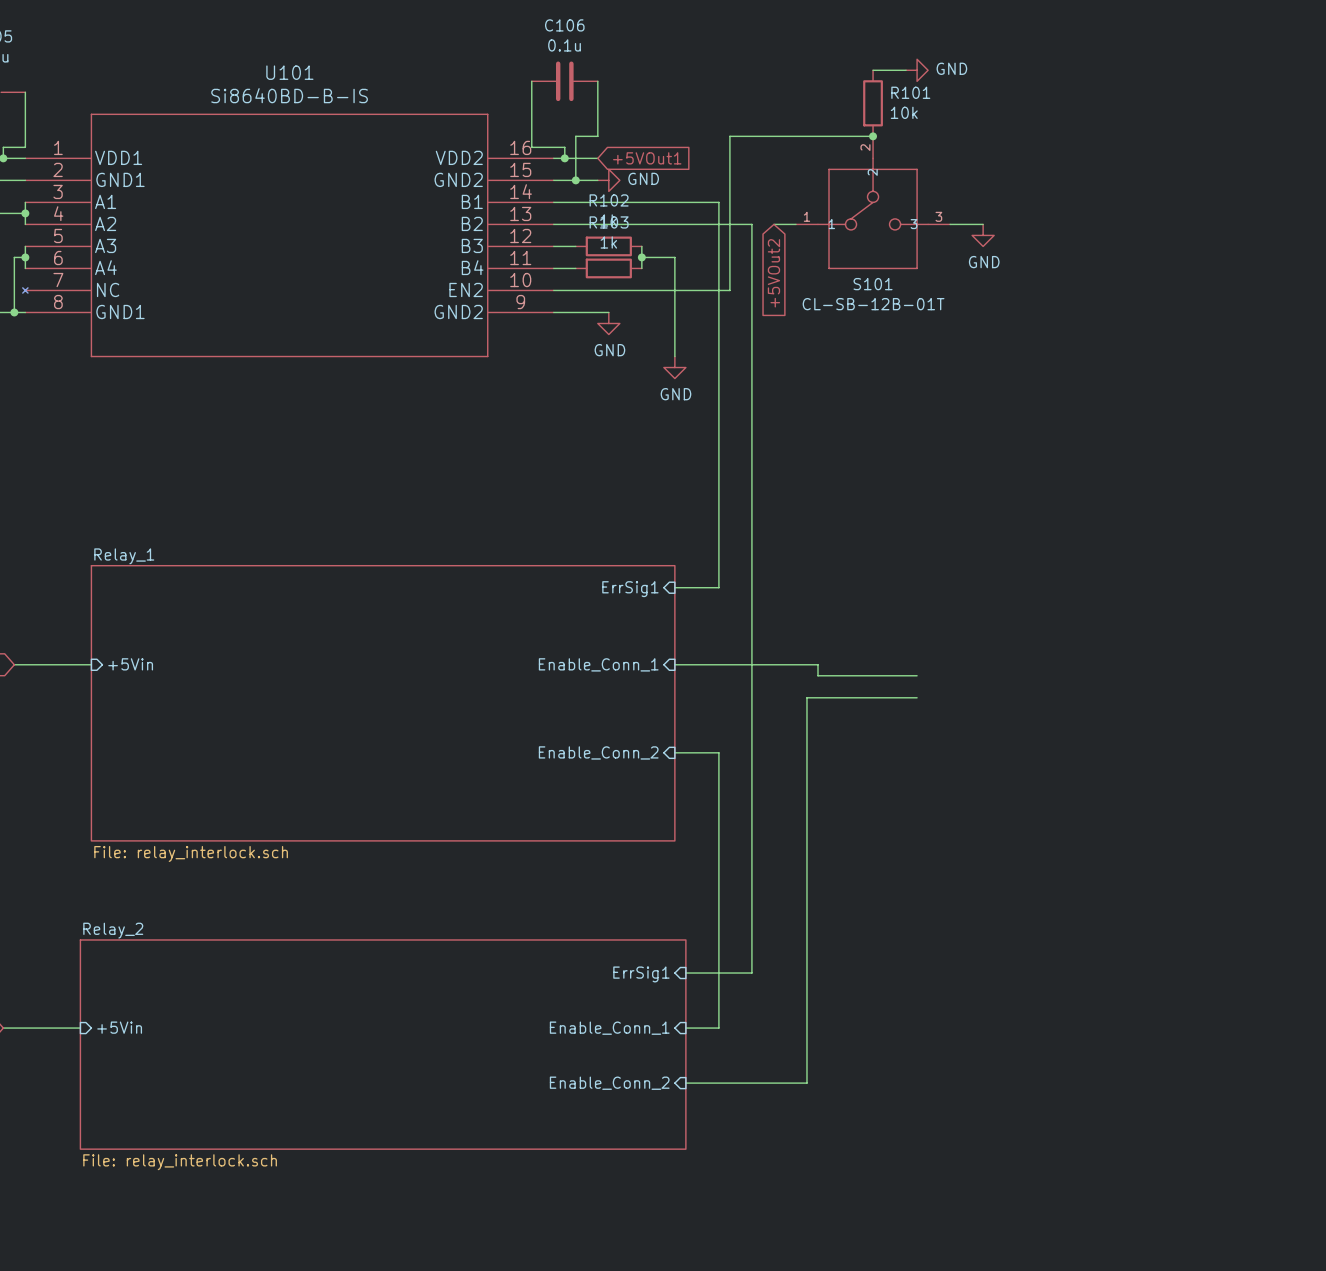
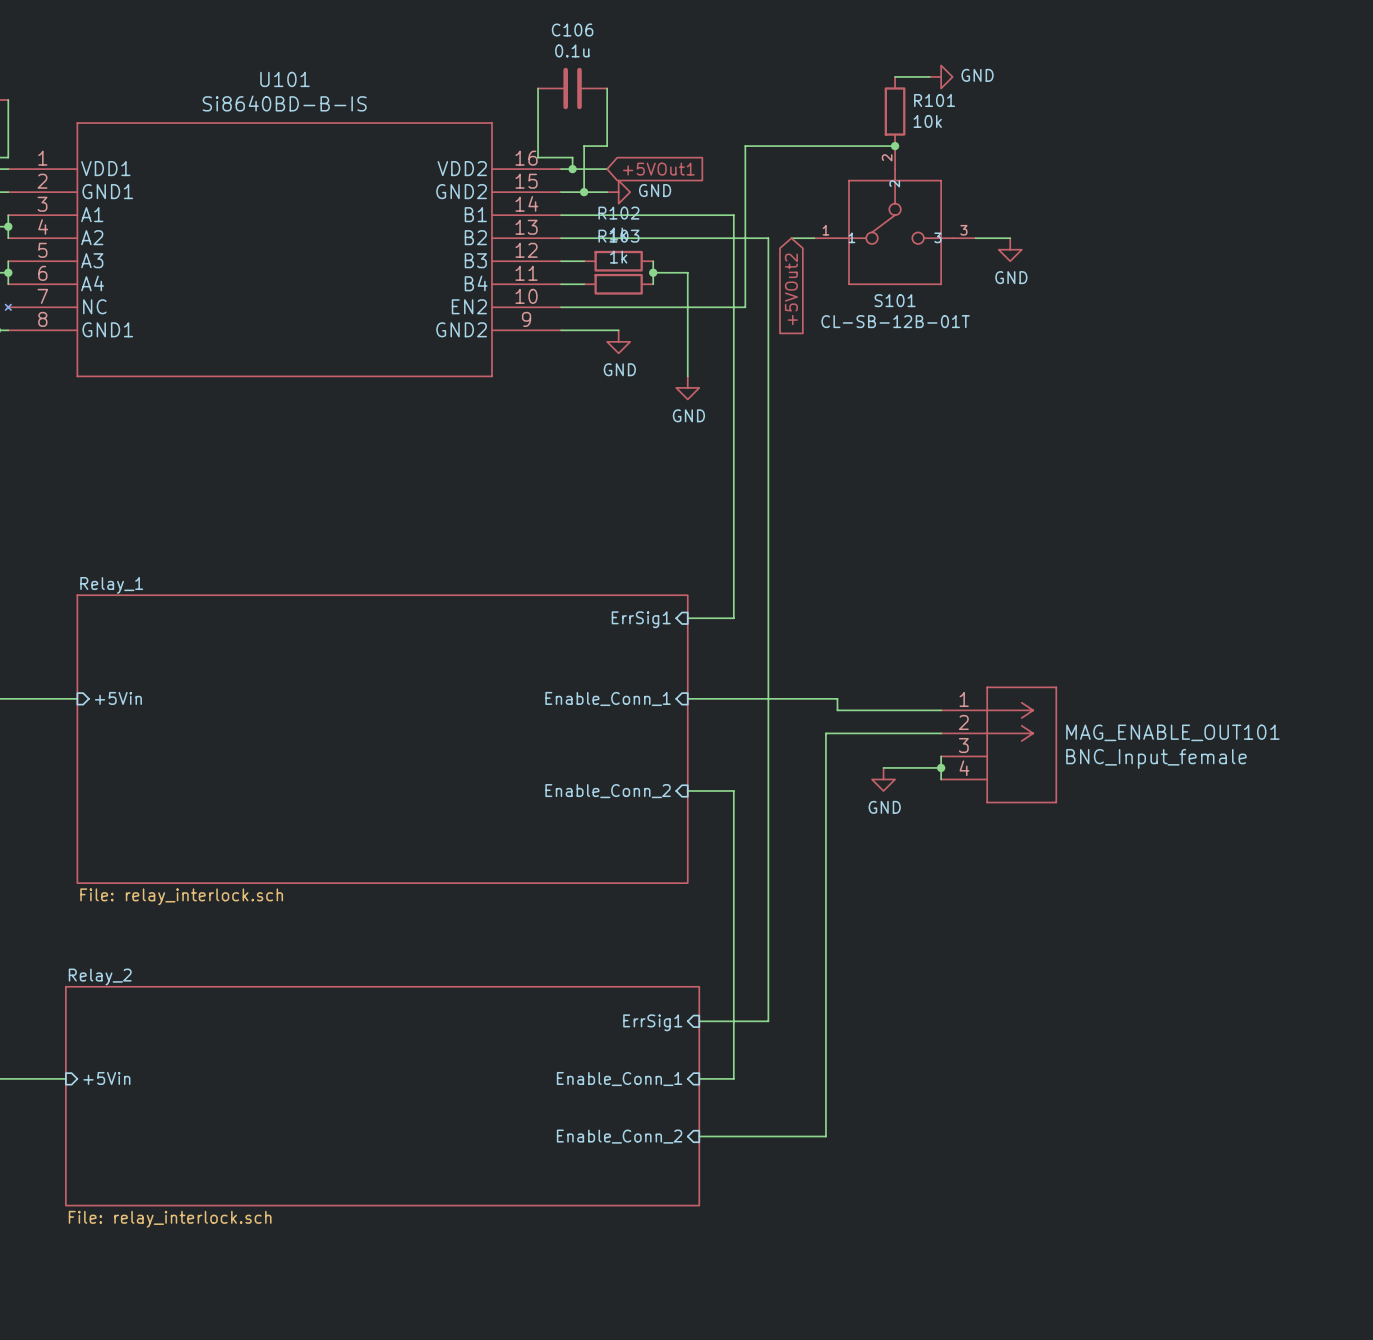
MAG_ENABLE_OUT101: none -> BNC_Input_female (998, 744)
wire: none -> (941, 756) (941, 779)
wire: none -> (883, 767) (941, 767)
junction: none -> (941, 767)
power symbol: none -> GND (883, 779)

